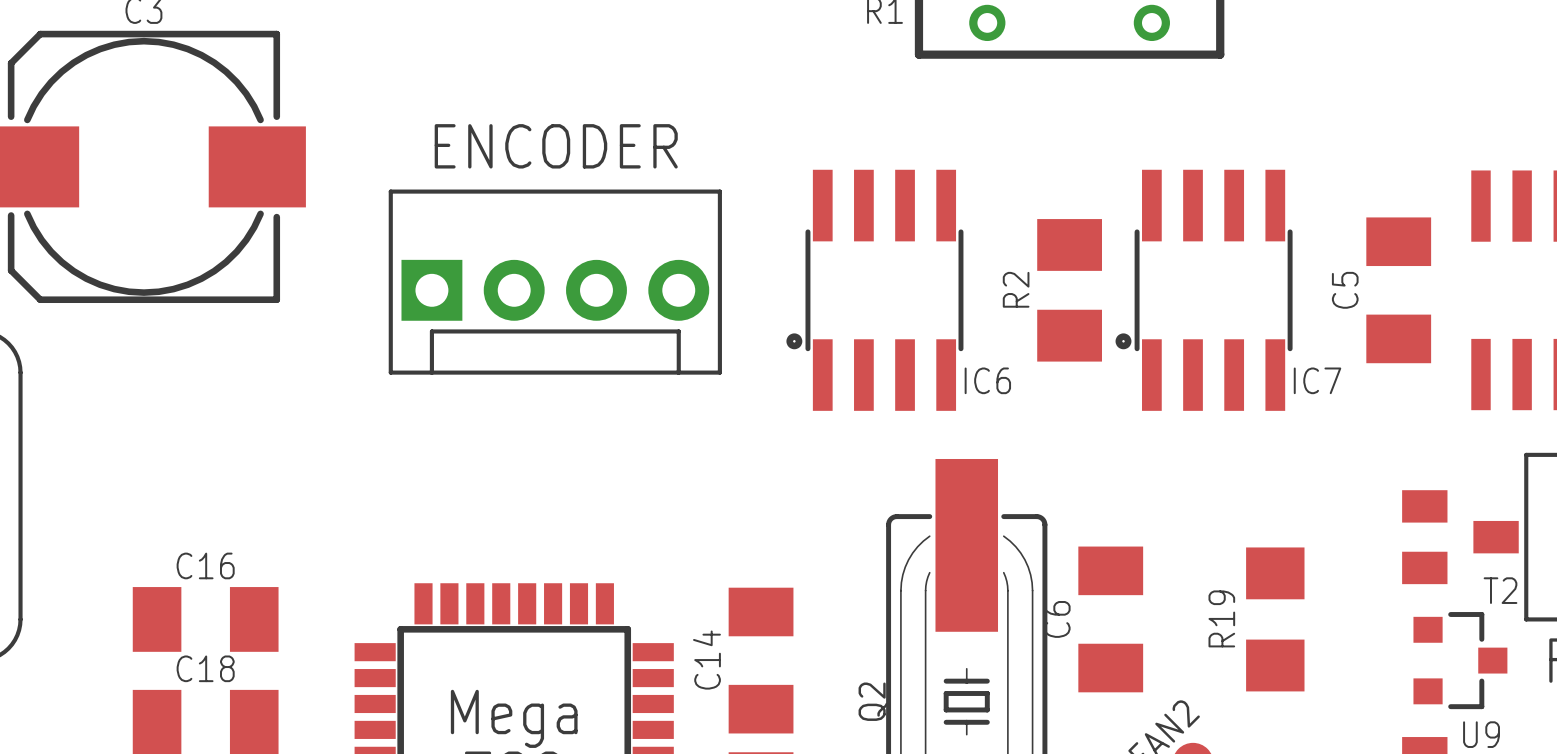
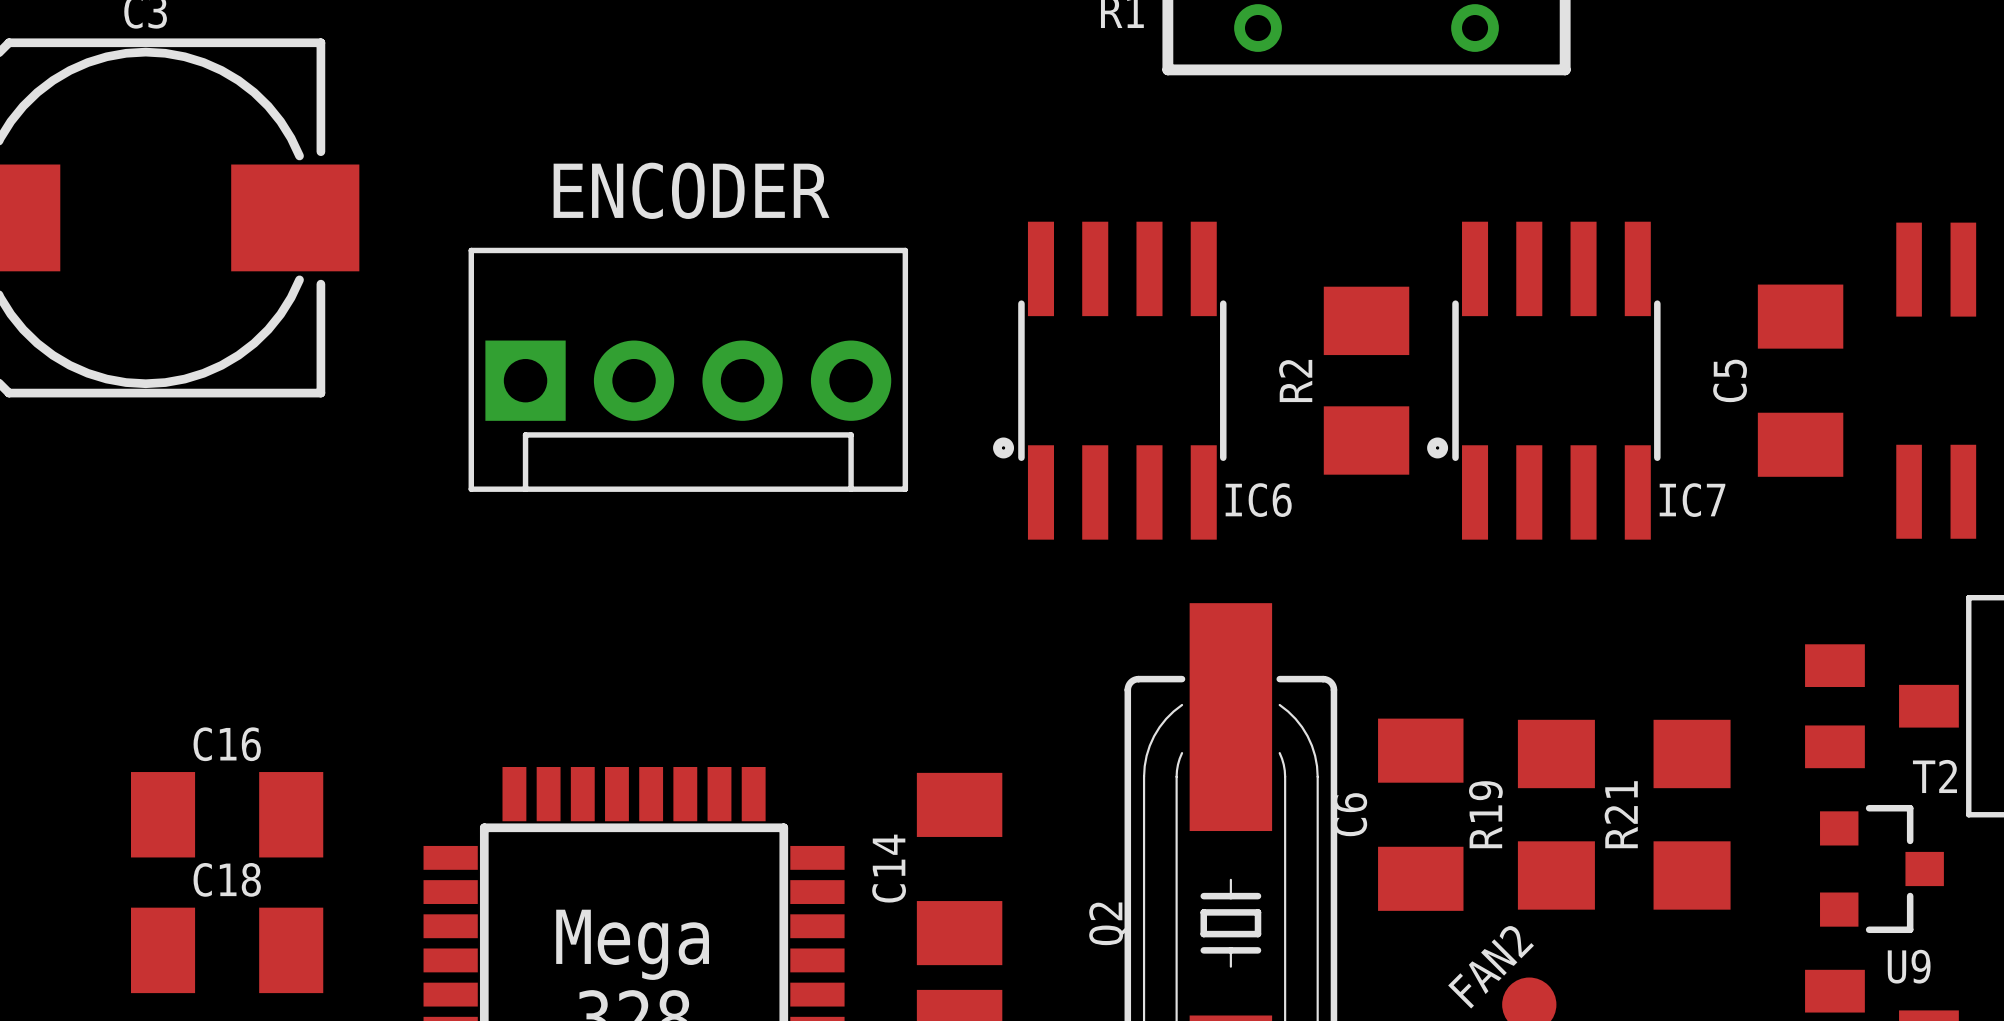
R19 position: (1275, 619) -> (1556, 814)
R21: none -> (1692, 814)

